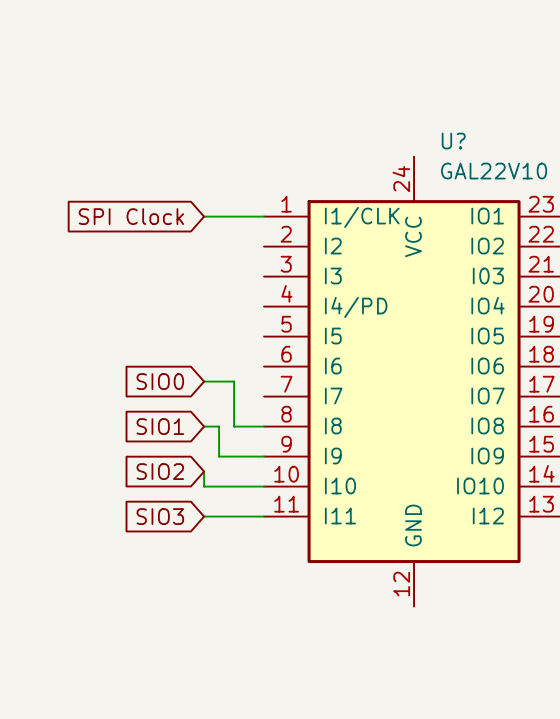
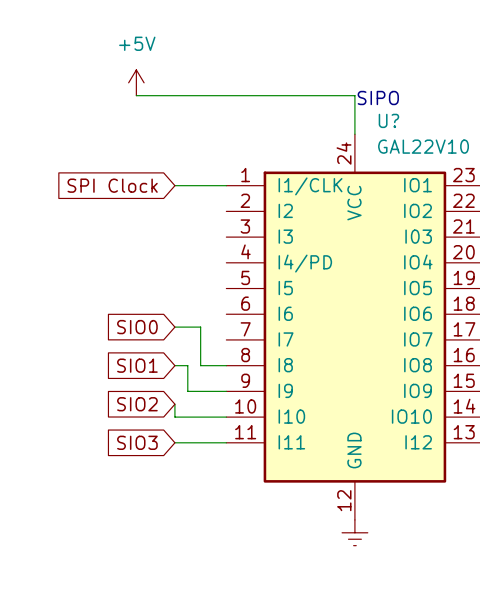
power symbol: none -> +5V (136, 82)
wire: none -> (136, 95) (354, 95) (354, 134)
text: none -> SIPO (378, 98)
power symbol: none -> (354, 532)

